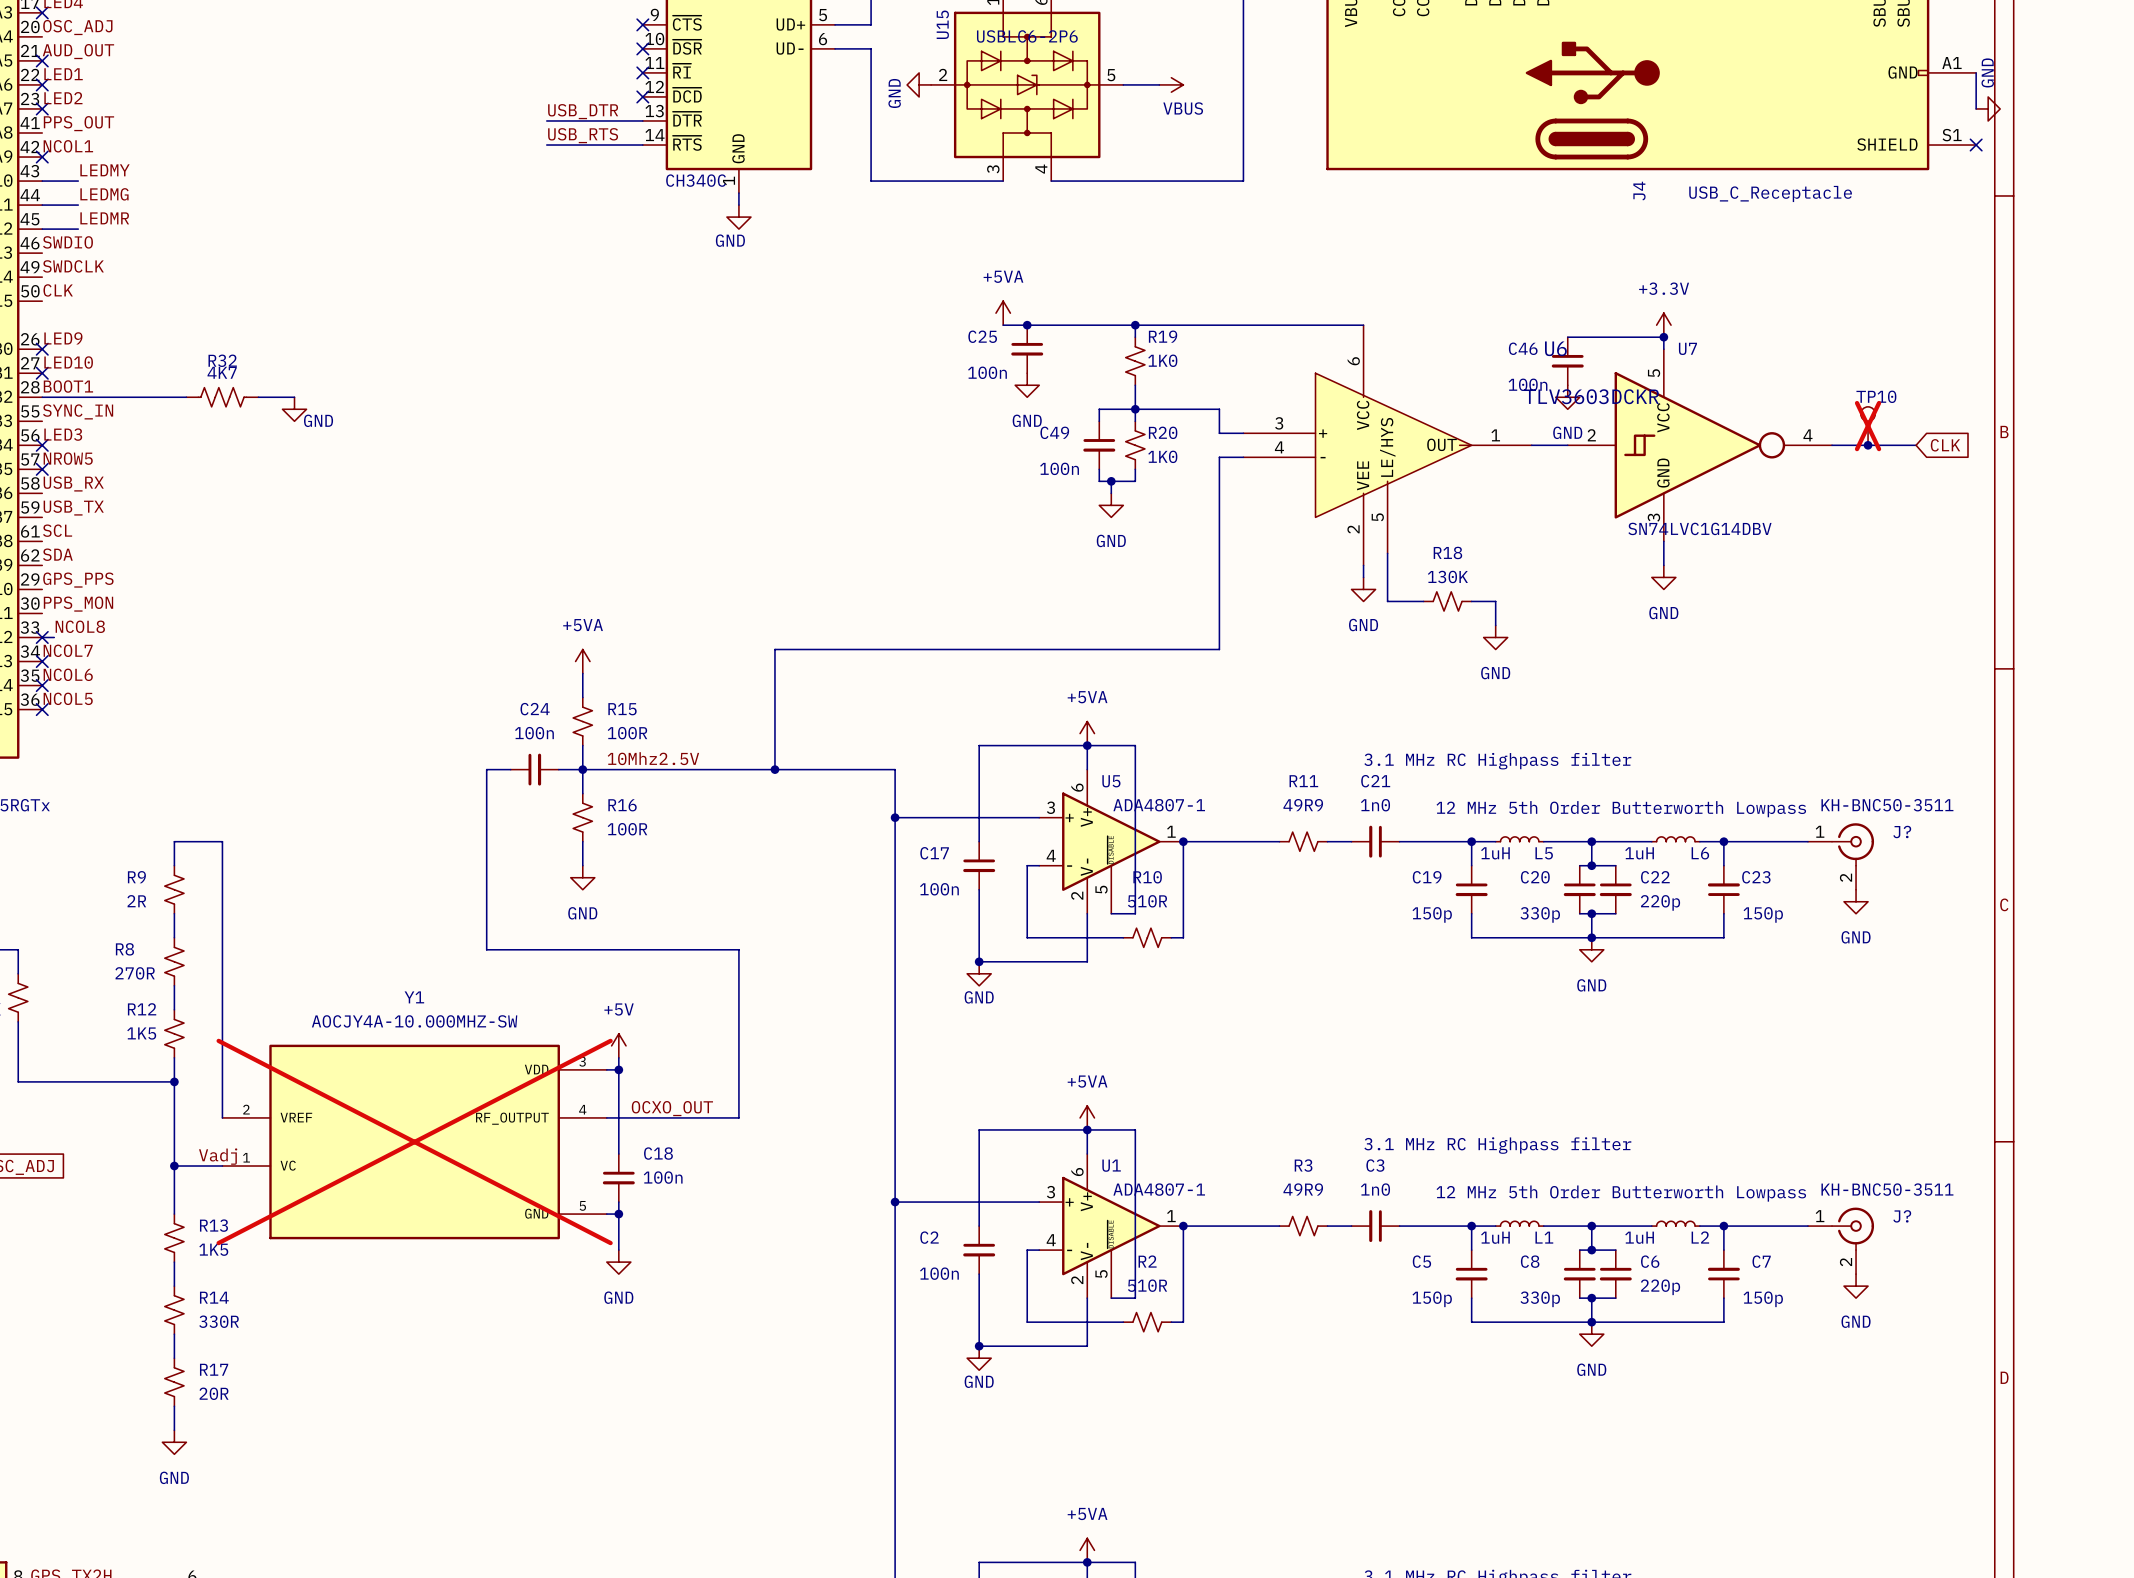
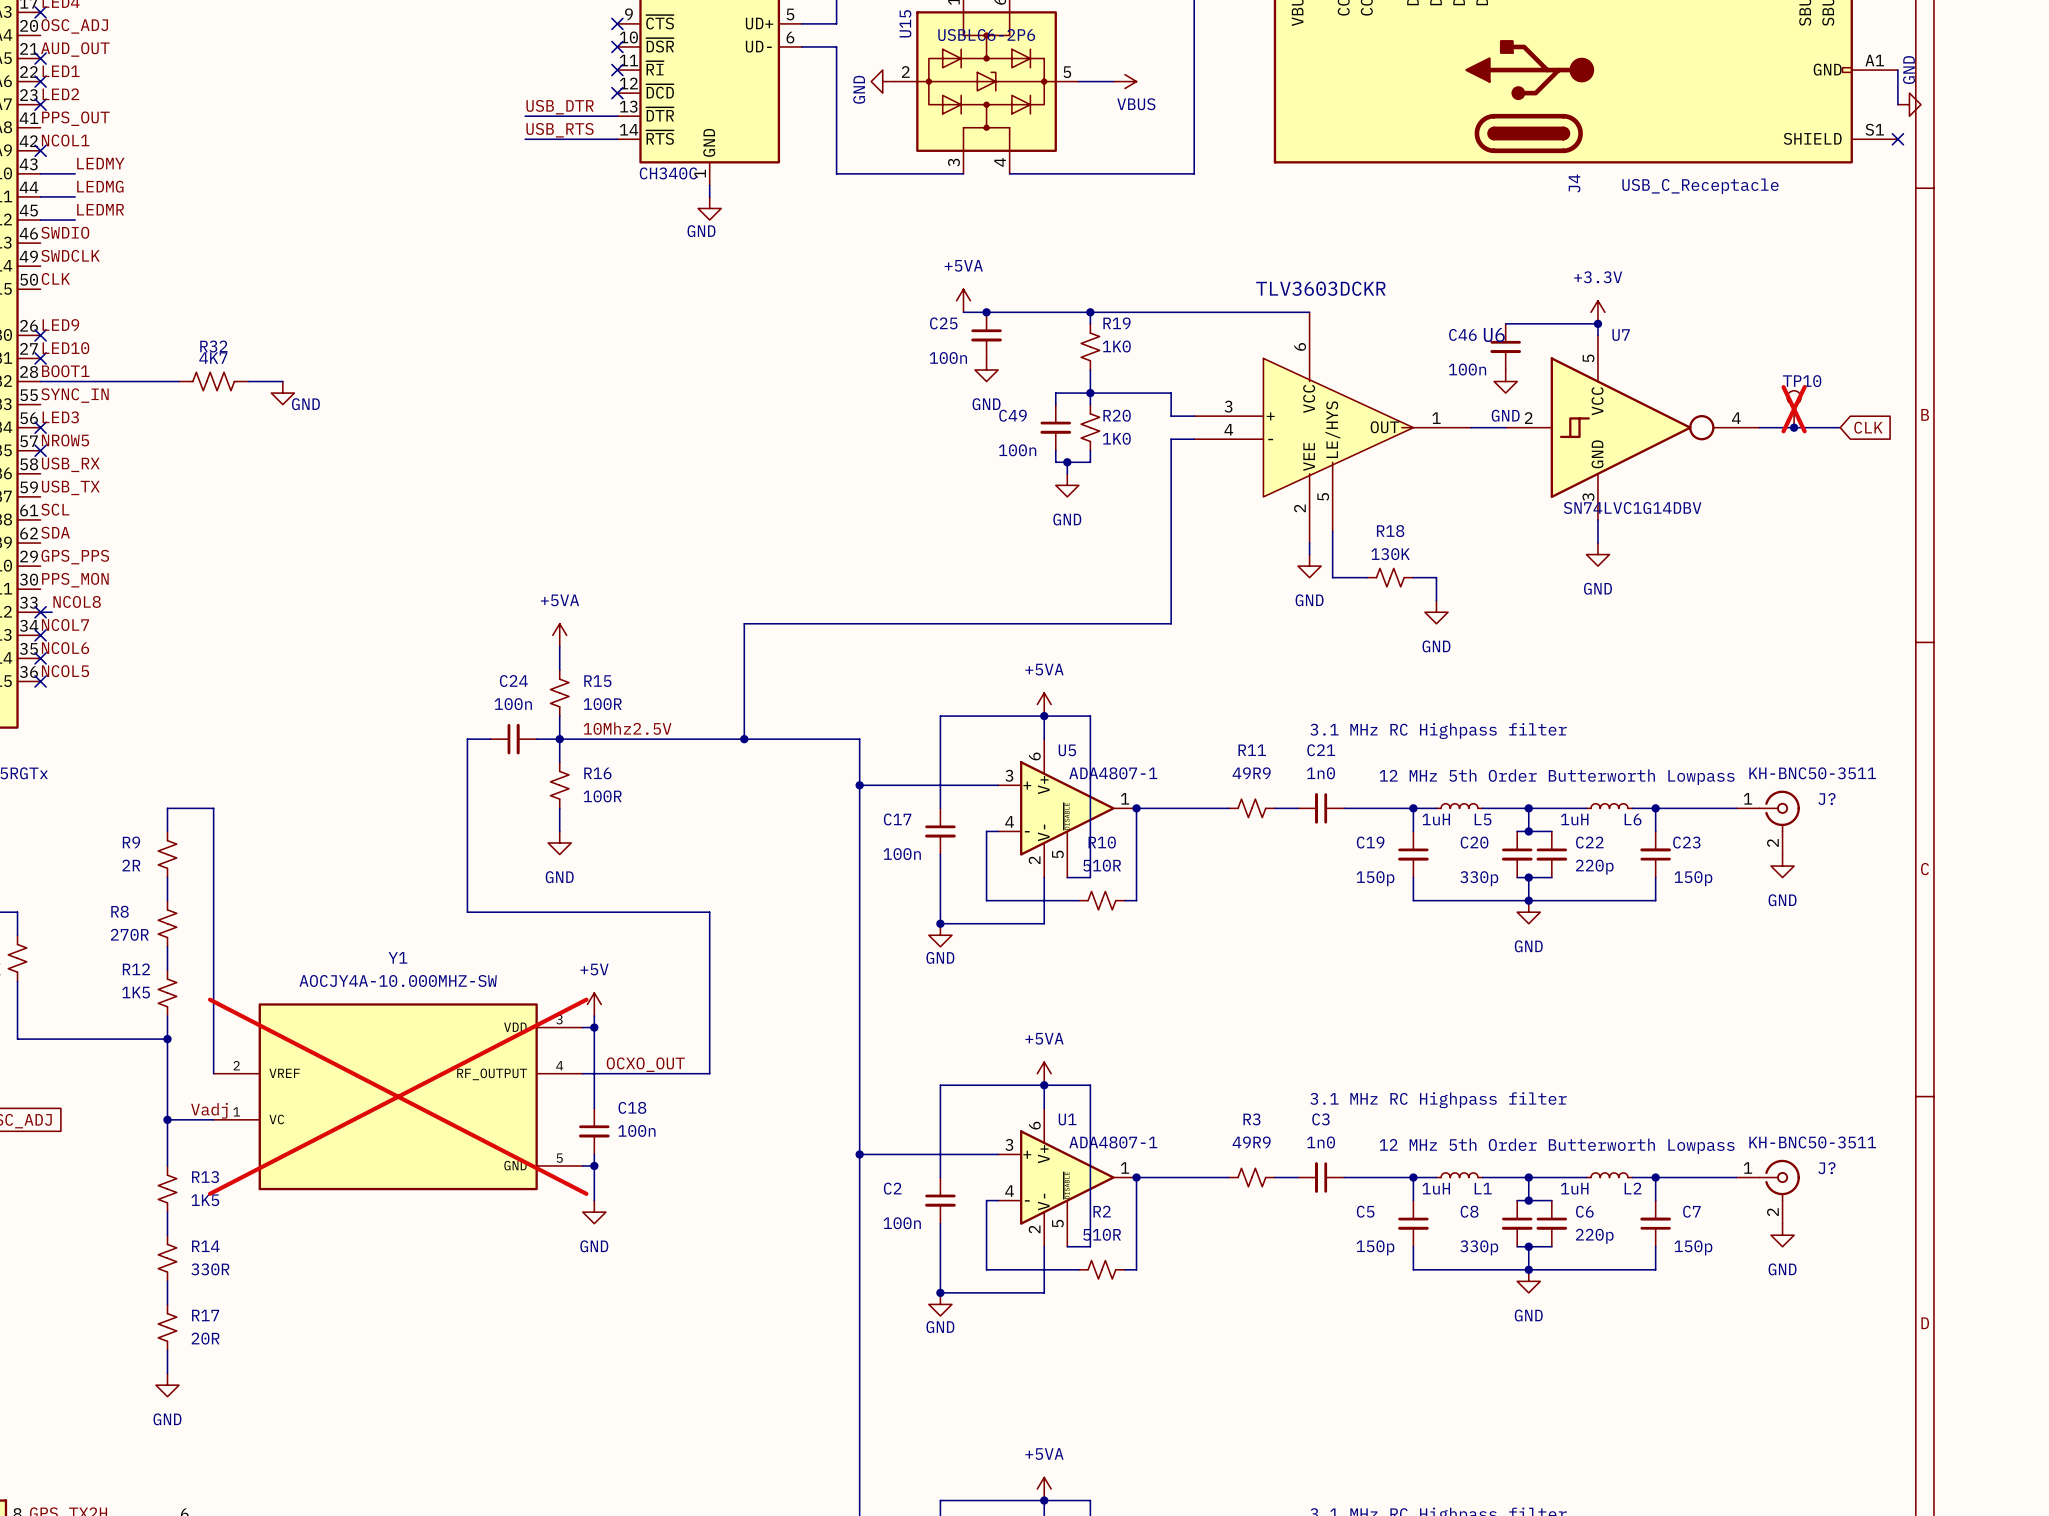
U6 value position: TLV3603DCKR (1591, 396) -> TLV3603DCKR (1320, 288)

